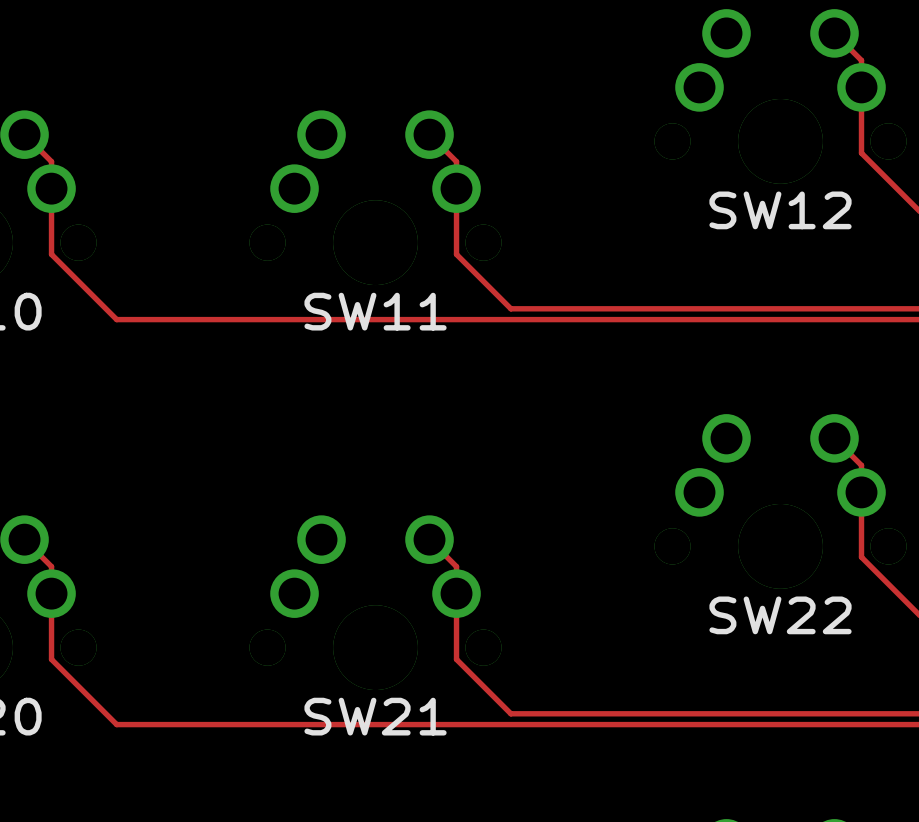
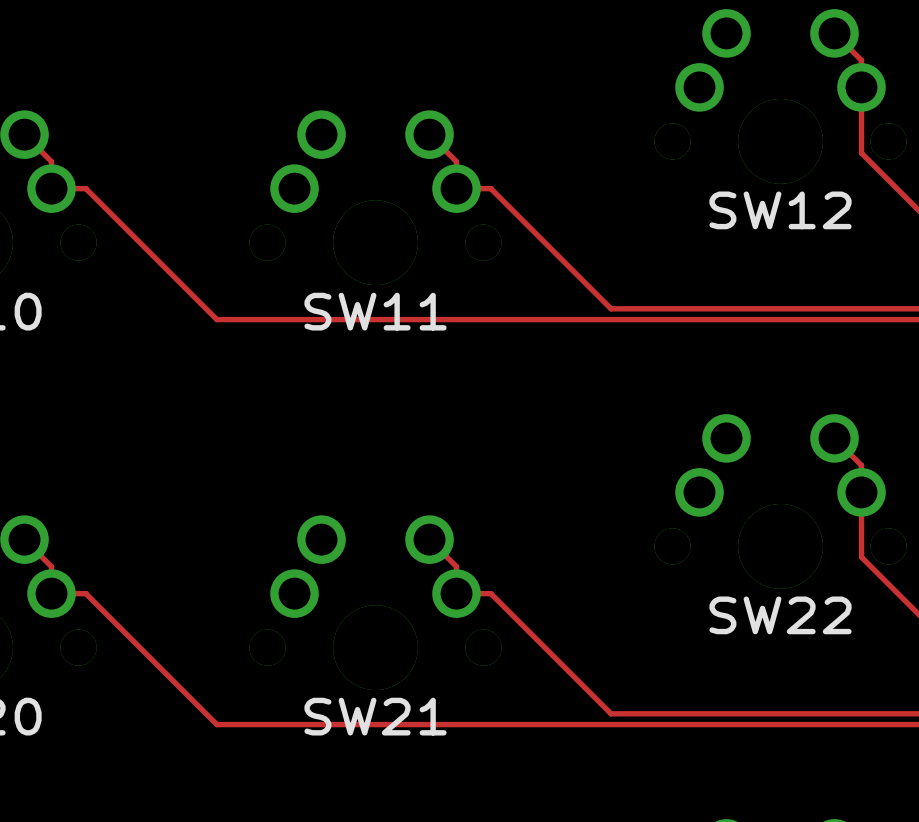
track: (51, 188) (51, 254) (116, 319) (216, 319) -> (51, 188) (85, 188) (216, 319)
track: (456, 188) (456, 254) (510, 308) (611, 308) -> (456, 188) (490, 188) (611, 308)
track: (51, 593) (51, 659) (116, 724) (216, 724) -> (51, 593) (85, 593) (216, 724)
track: (456, 593) (456, 659) (510, 713) (611, 713) -> (456, 593) (490, 593) (611, 713)

